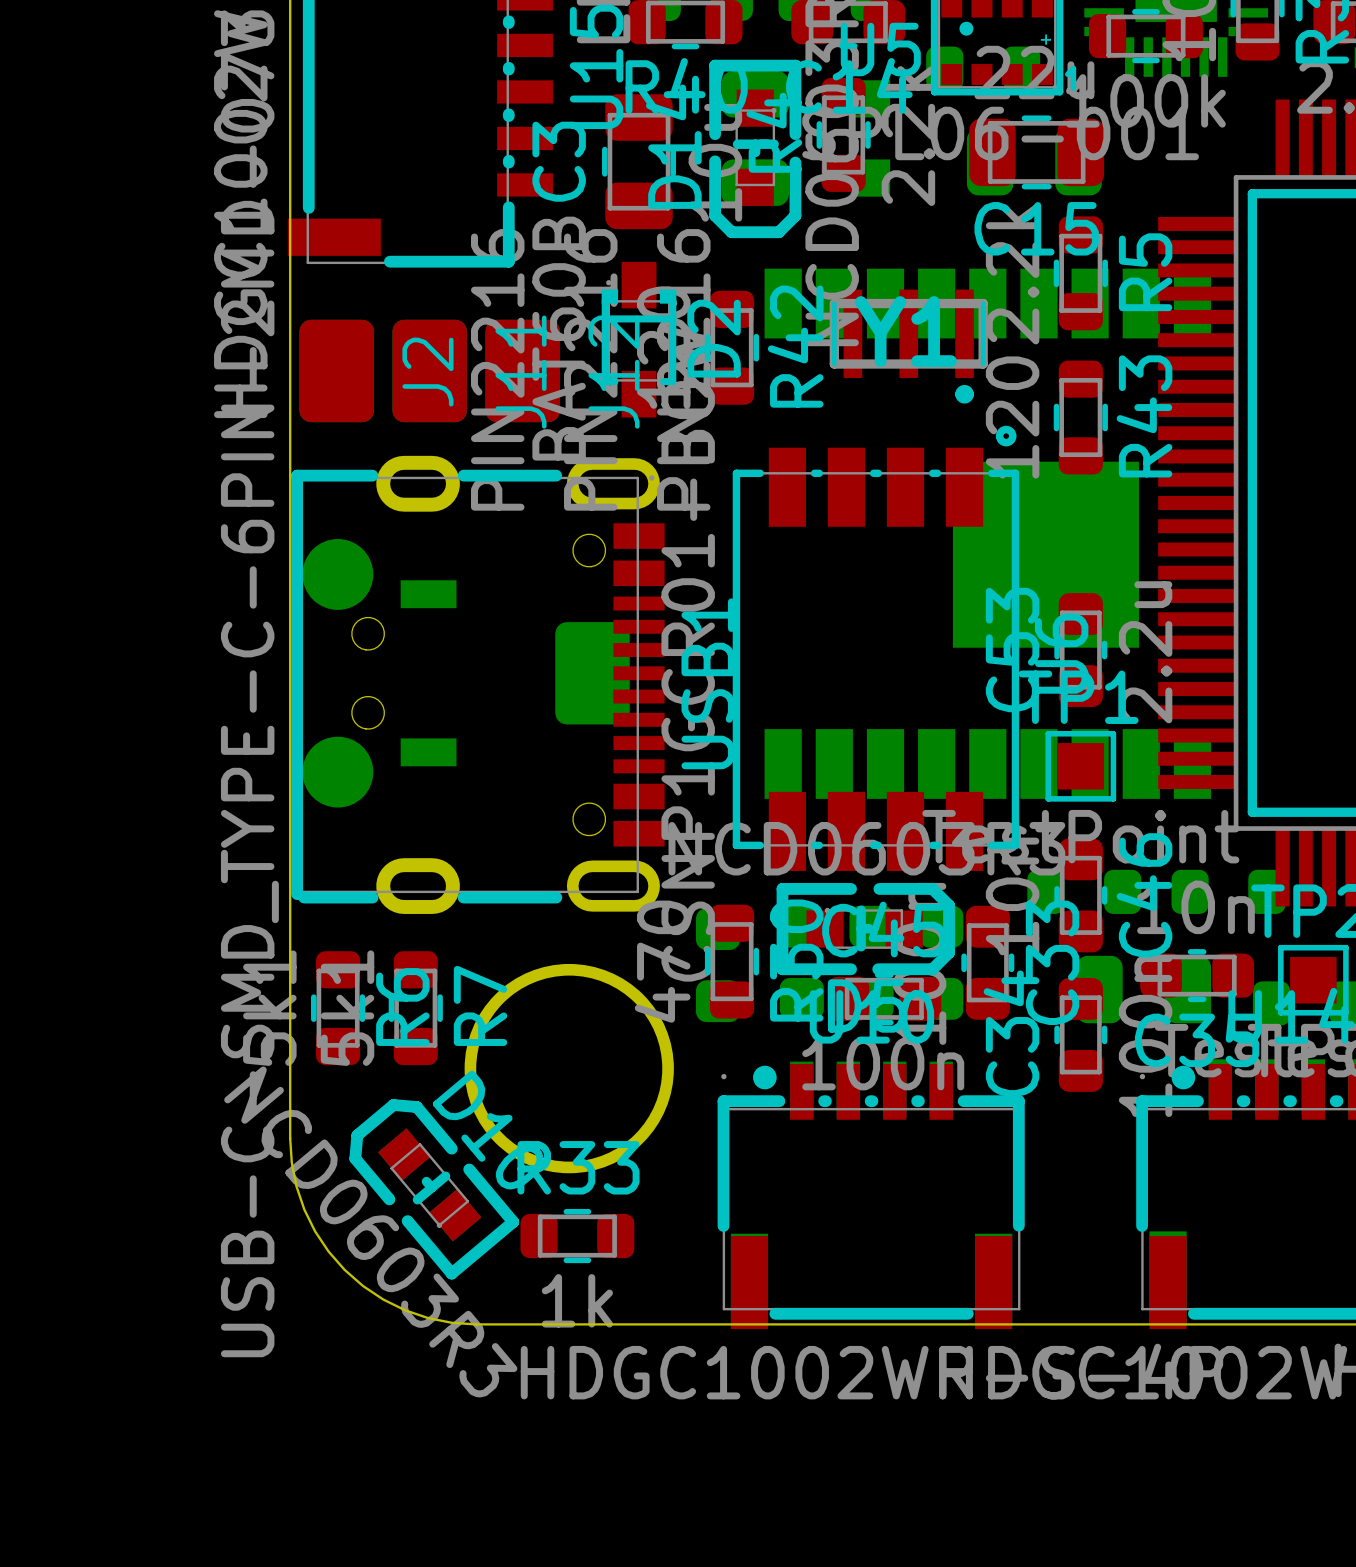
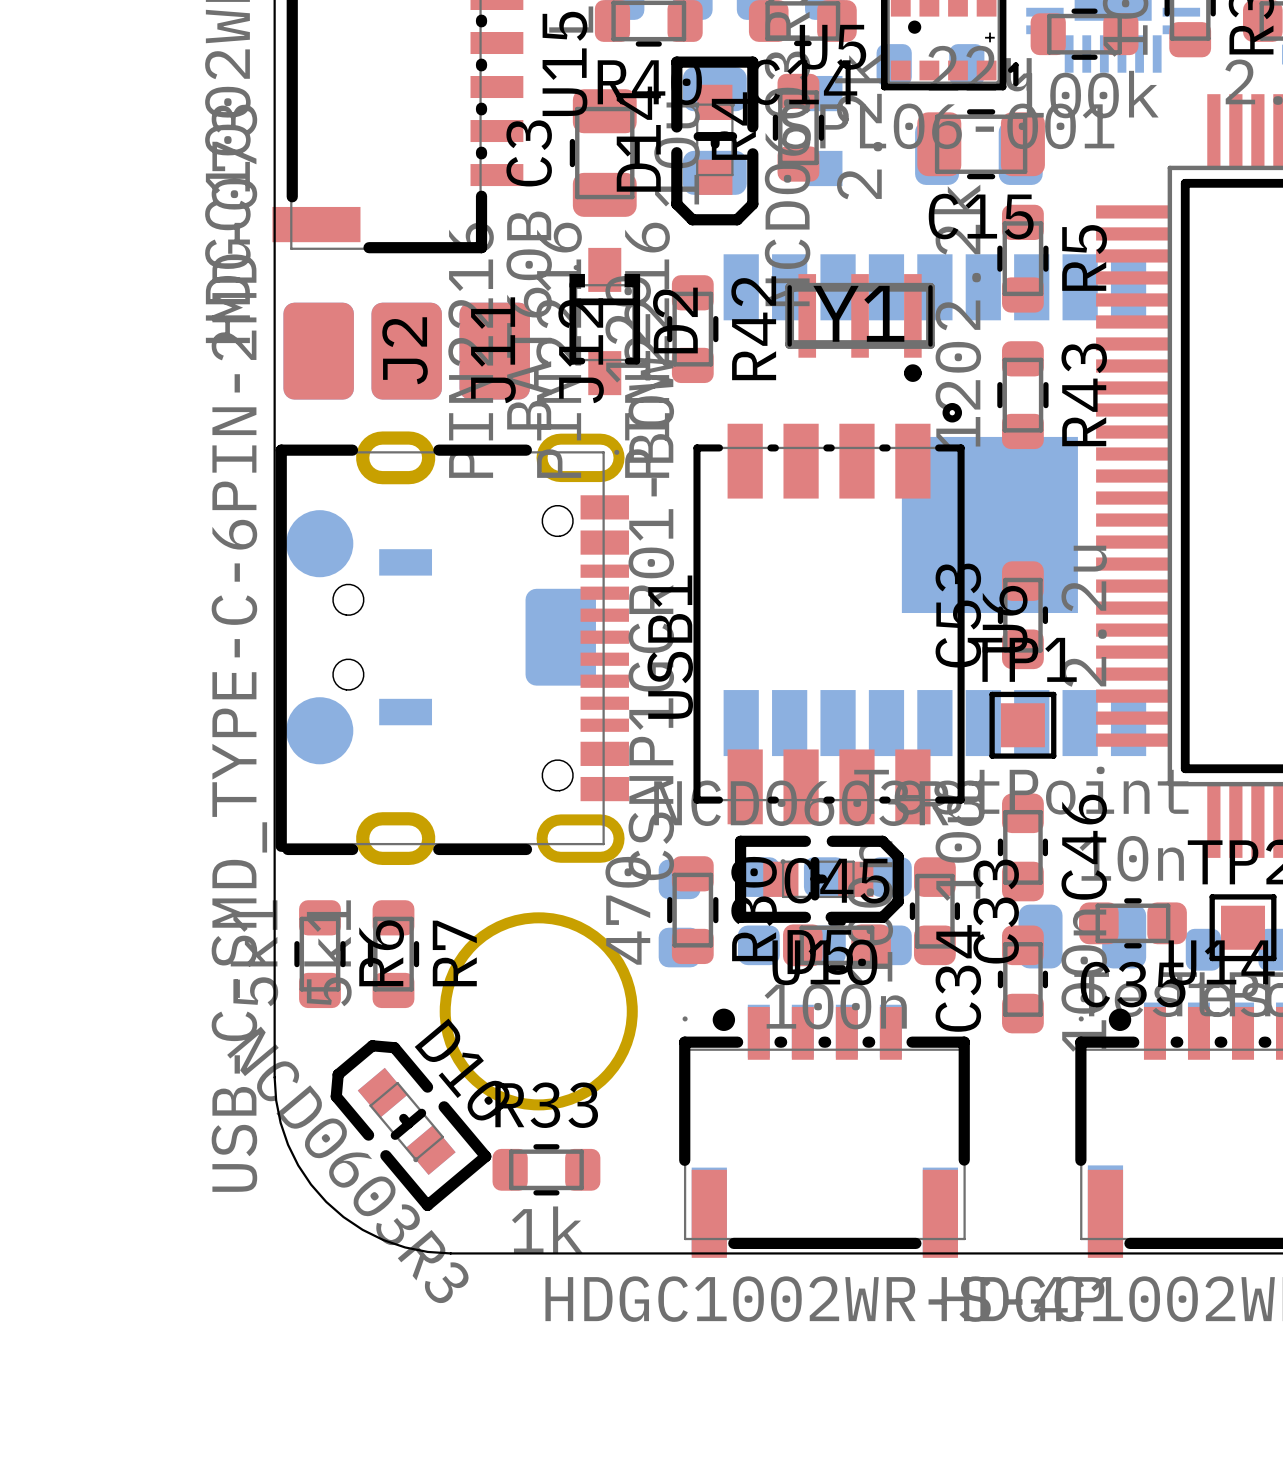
part: (1084, 891) -> none
part: (1228, 891) -> none

